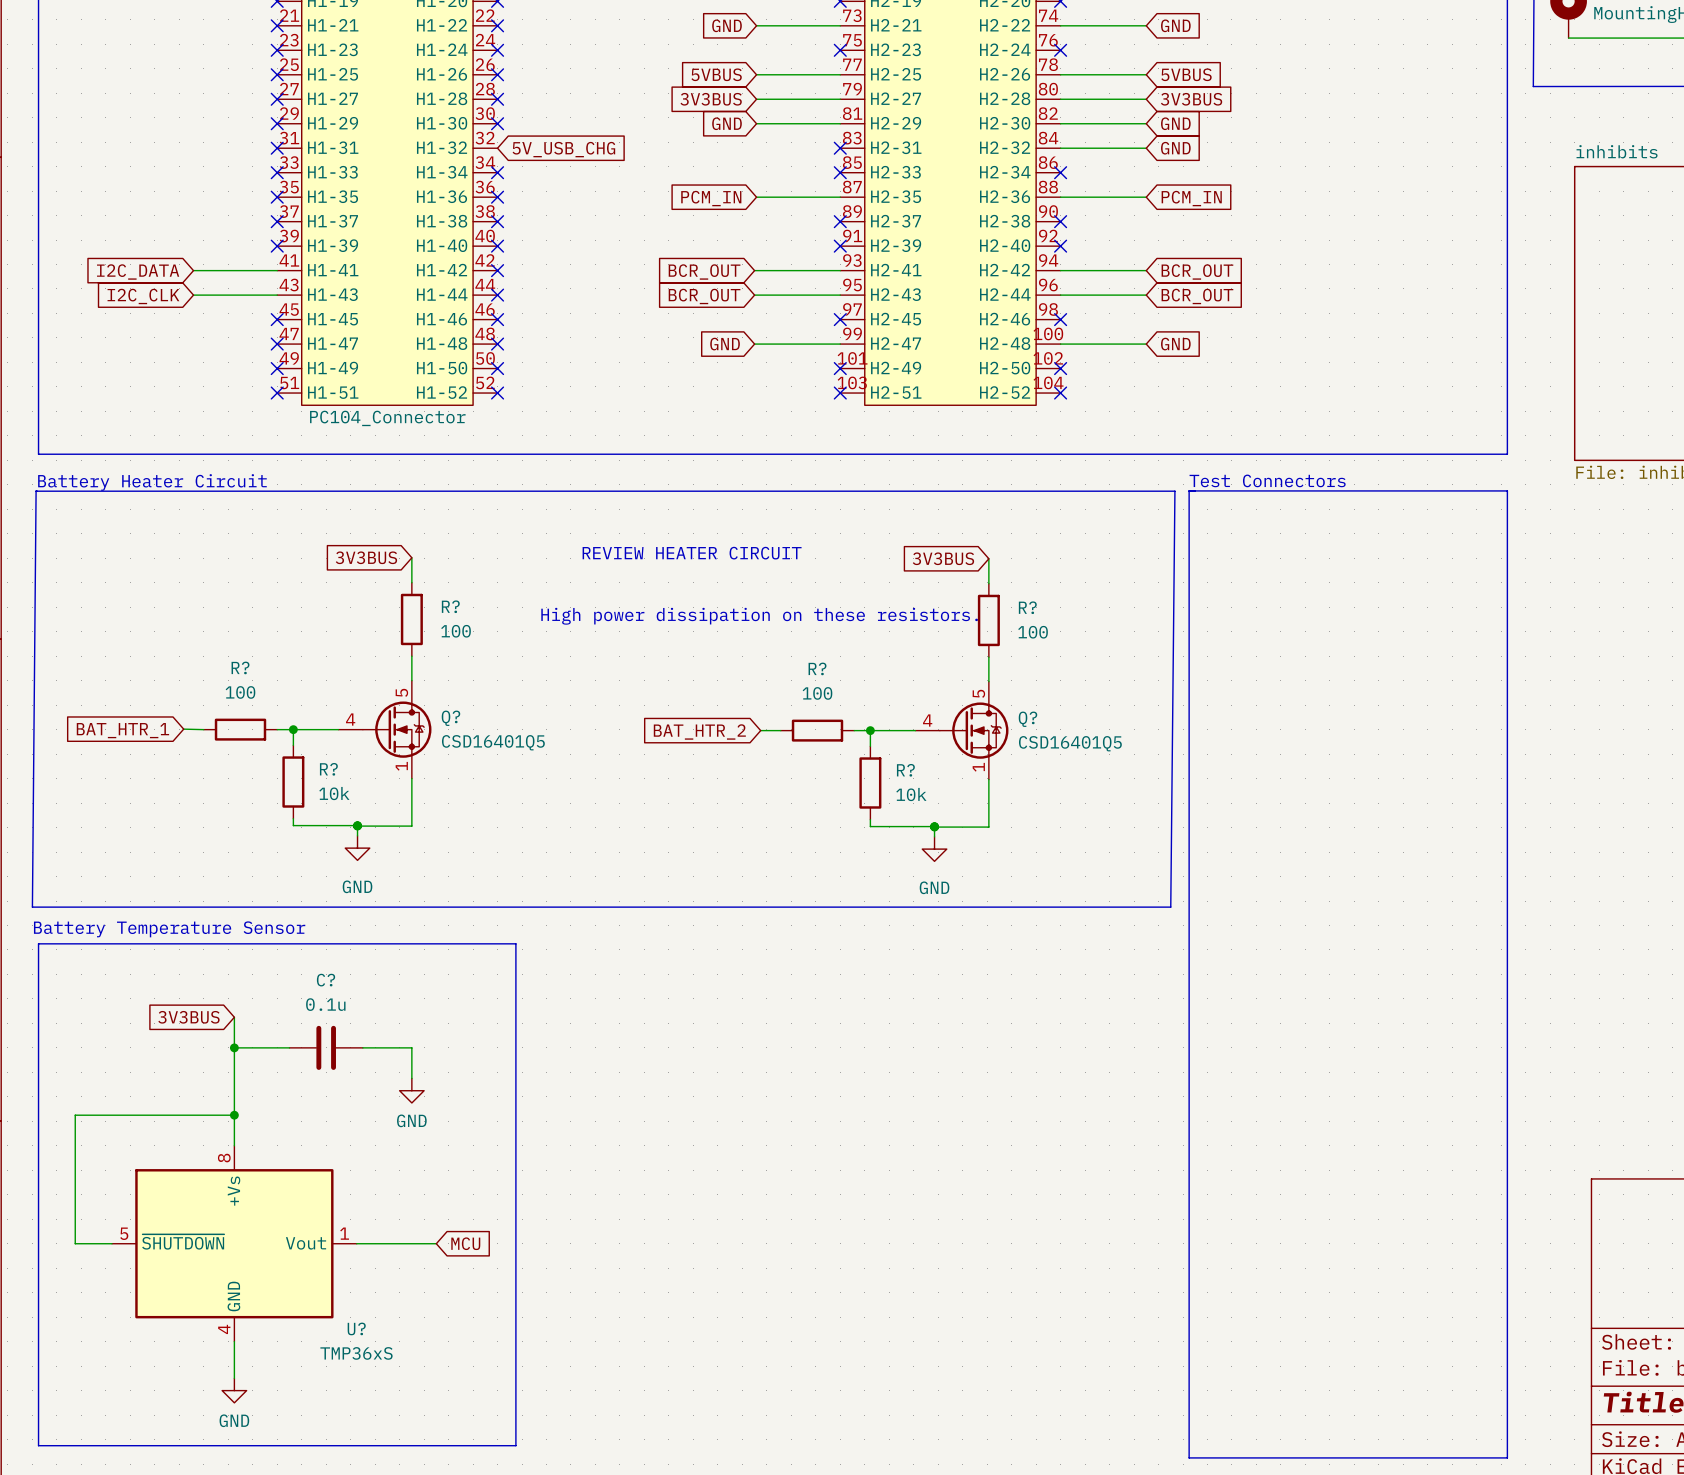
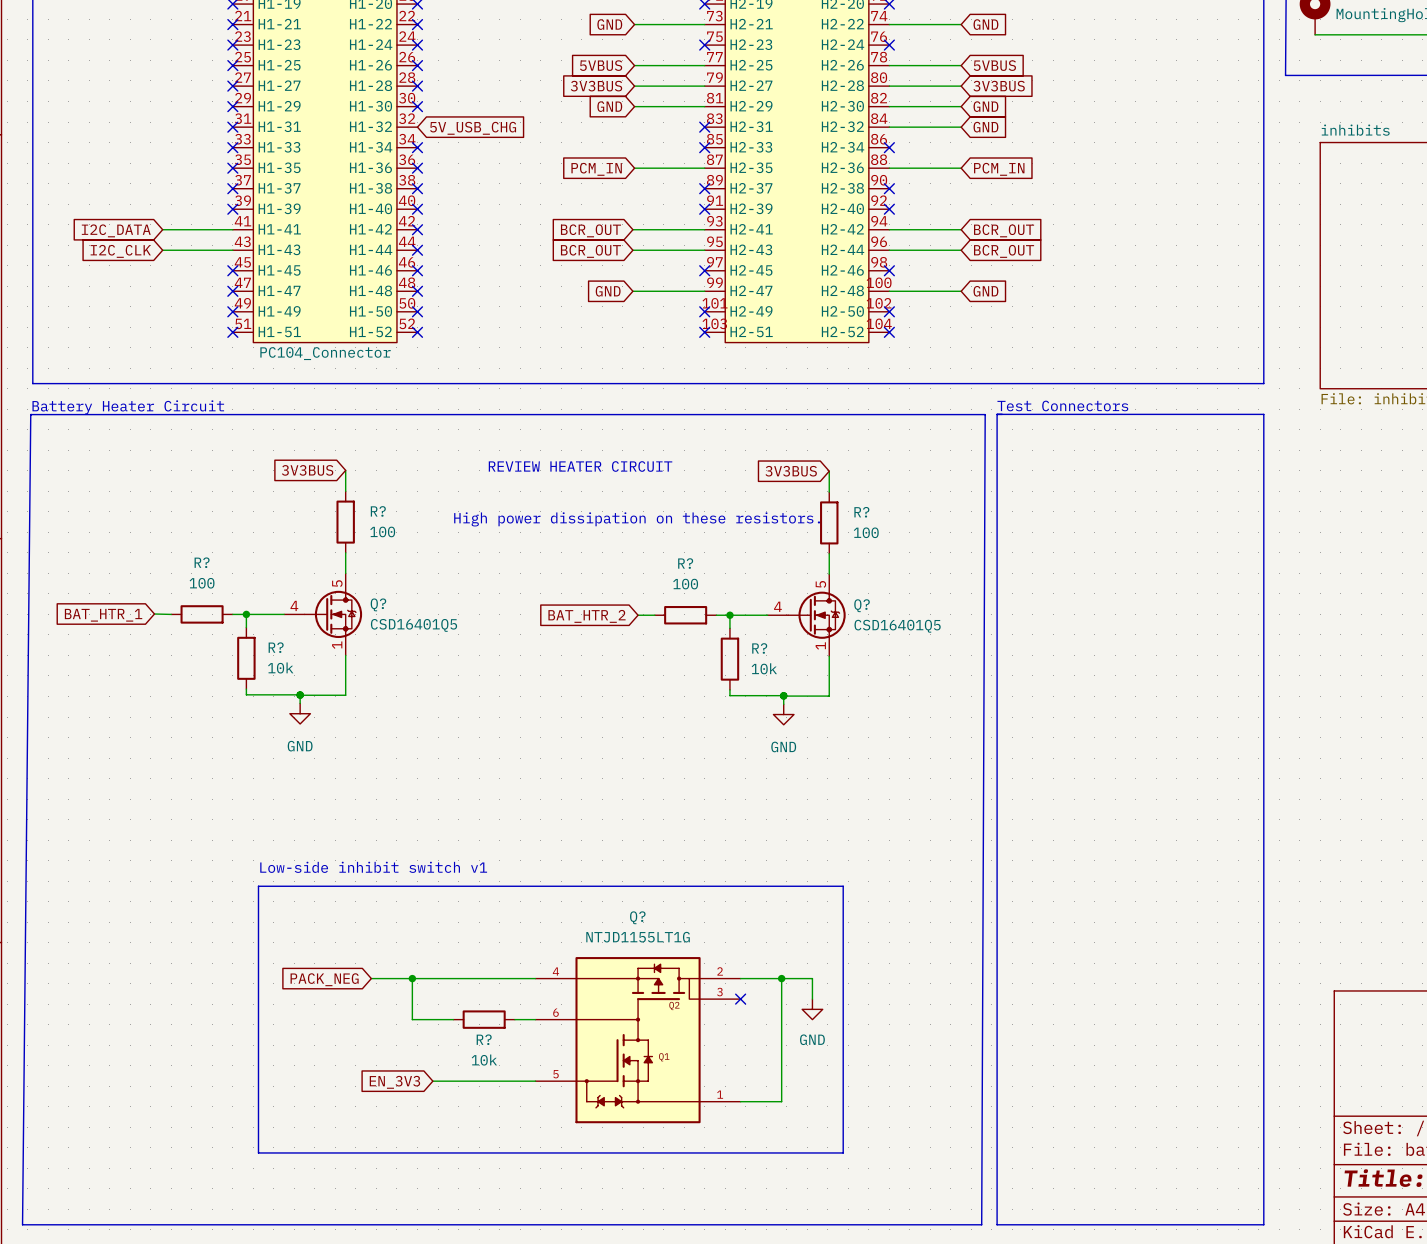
line: (36, 491) (32, 907) (1170, 907) (1174, 491) -> (30, 414) (22, 1224) (981, 1224) (985, 414)
text: Battery Temperature Sensor (169, 929) -> none
line: (38, 943) (38, 1445) (515, 1445) (515, 943) (38, 943) -> none
global label: 3V3BUS (188, 1017) -> none
wire: (234, 1017) (234, 1145) -> none
text: none -> Low-side inhibit switch v1 (373, 867)
wire: (234, 1047) (289, 1047) -> none
junction: (234, 1047) -> none
C?: 0.1u (326, 1047) -> none
wire: (362, 1047) (411, 1047) (411, 1078) -> none
line: none -> (258, 886) (843, 886) (843, 1152) (258, 1152) (258, 886)
power symbol: GND (411, 1090) -> none
wire: (234, 1115) (75, 1115) (75, 1243) (111, 1243) -> none
junction: (234, 1115) -> none
wire: none -> (371, 978) (535, 978)
wire: none -> (412, 978) (412, 1019) (453, 1019)
junction: none -> (412, 978)
wire: none -> (740, 978) (812, 978) (812, 999)
wire: none -> (781, 978) (781, 1101) (740, 1101)
junction: none -> (781, 978)
global label: none -> PACK_NEG (324, 979)
no-connect mark: none -> (740, 999)
power symbol: none -> GND (812, 1009)
R?: none -> 10k (484, 1019)
wire: none -> (514, 1019) (535, 1019)
Q?: none -> NTJD1155LT1G (638, 1040)
U?: TMP36xS (234, 1243) -> none
wire: (356, 1243) (436, 1243) -> none
global label: MCU (465, 1243) -> none
wire: none -> (432, 1081) (535, 1081)
global label: none -> EN_3V3 (394, 1082)
wire: (234, 1341) (234, 1378) -> none
power symbol: GND (234, 1390) -> none

